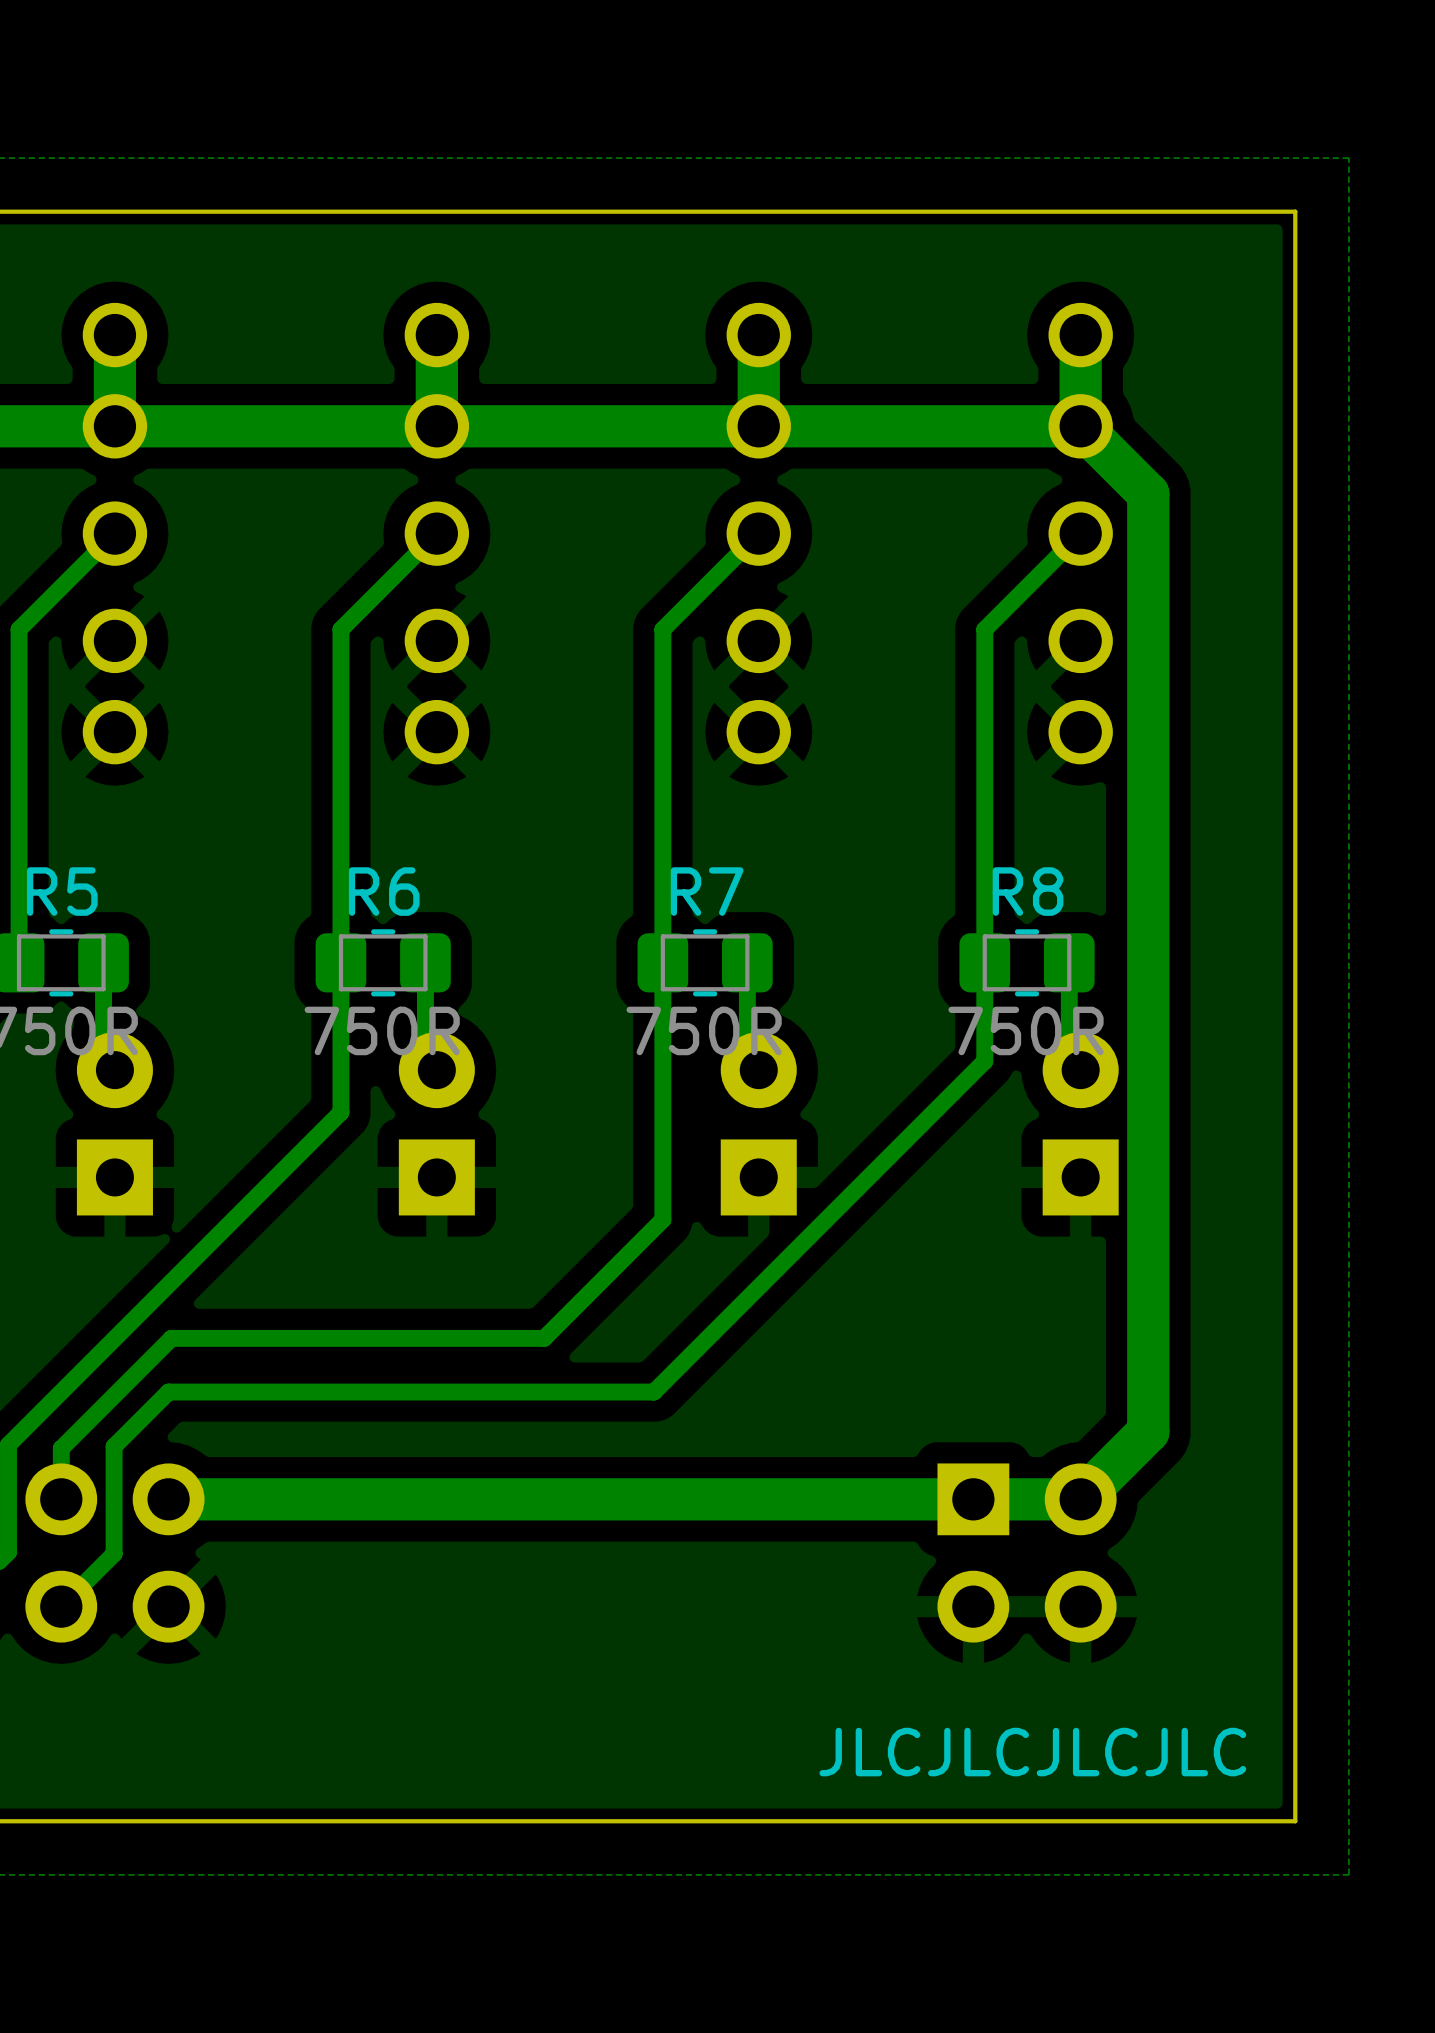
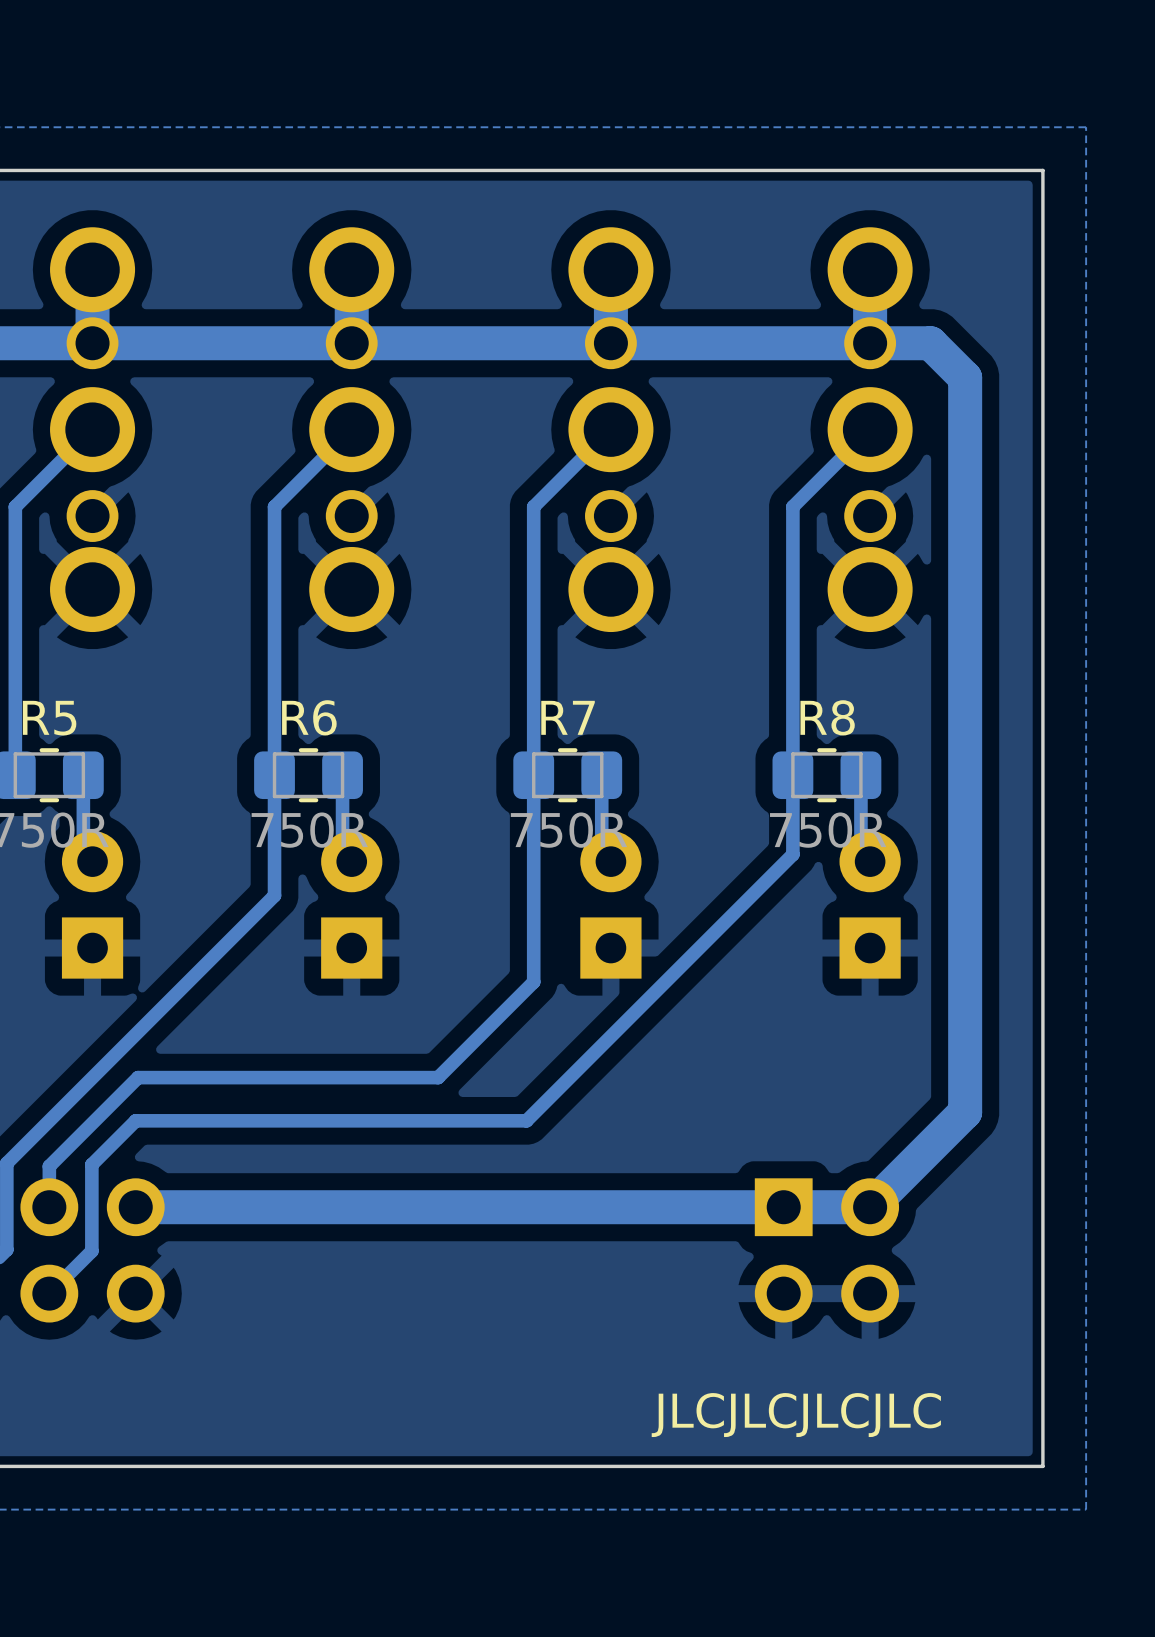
part footprint: [82, 302, 148, 765] -> [50, 227, 136, 633]
part footprint: [404, 302, 470, 765] -> [309, 227, 395, 633]
part footprint: [726, 302, 791, 765] -> [568, 227, 654, 633]
part footprint: [1048, 302, 1113, 765] -> [827, 227, 913, 633]
track: (1080, 426) (1148, 493) (1148, 1431) -> (870, 343) (930, 343) (965, 377) (965, 1112) (924, 1152)

